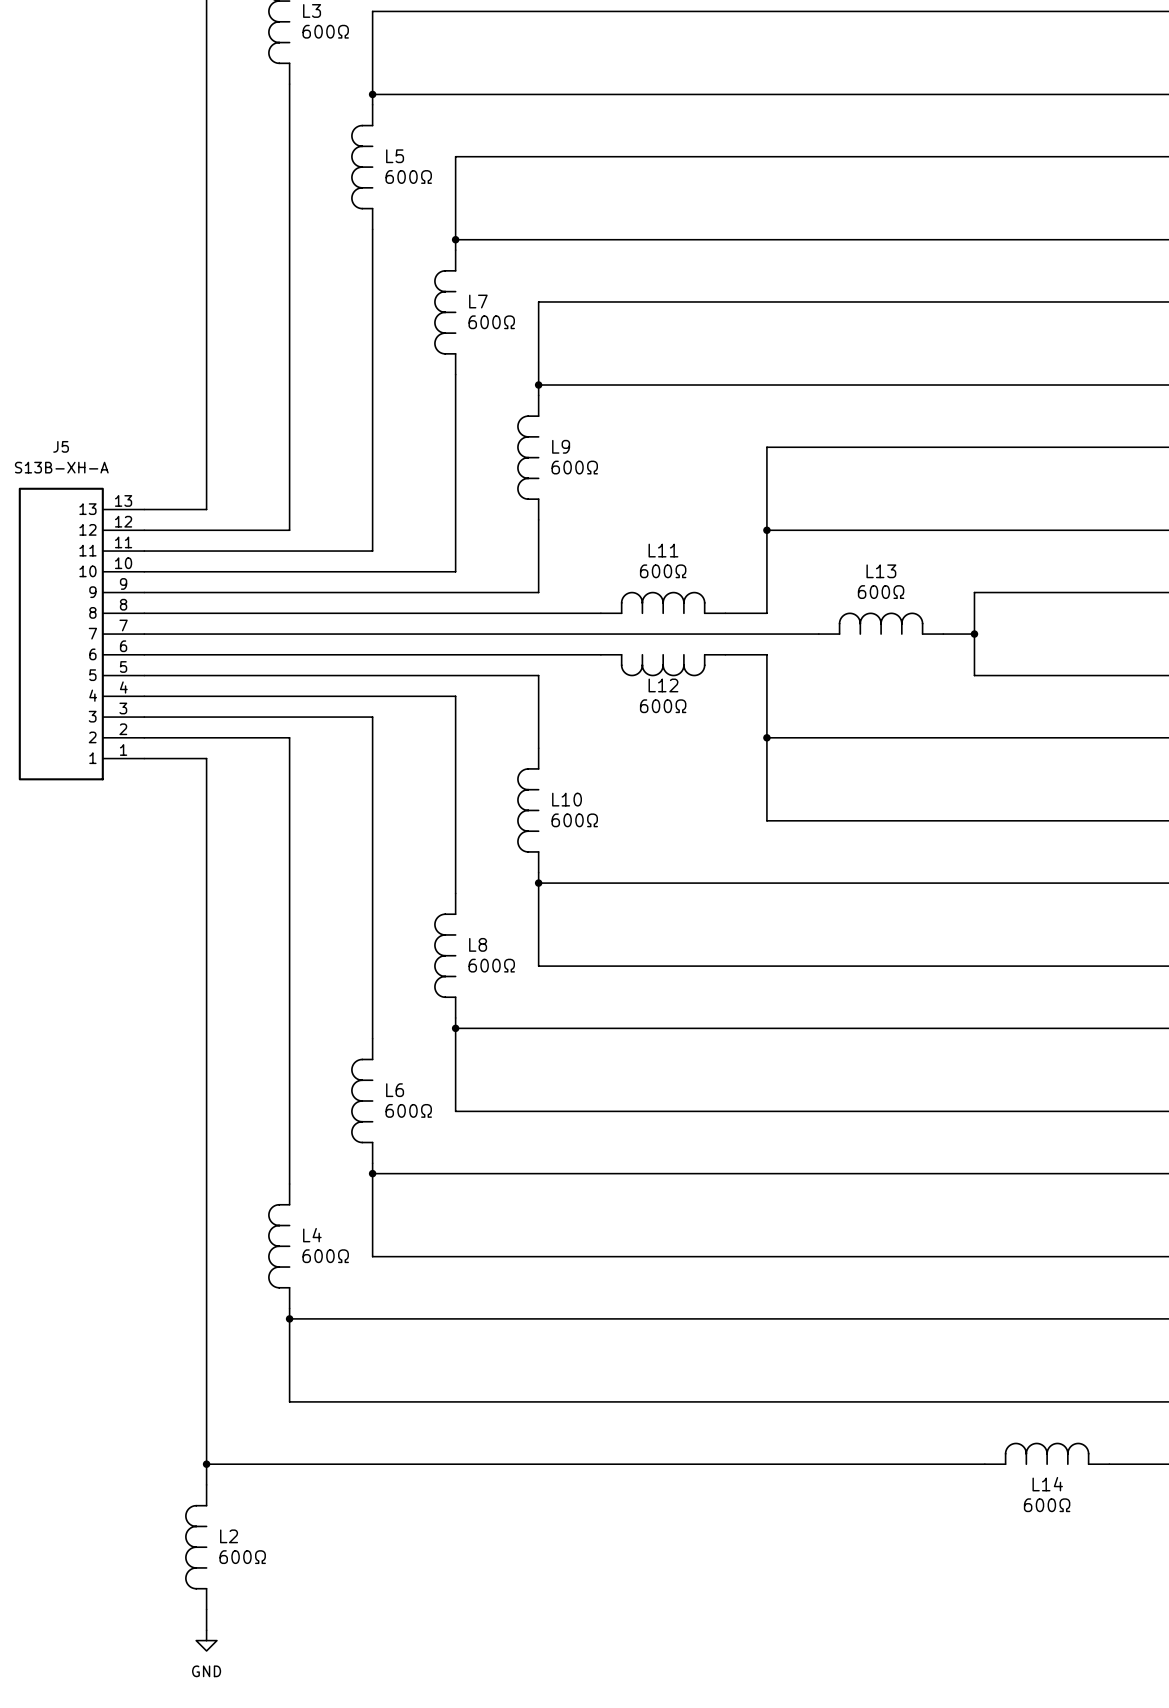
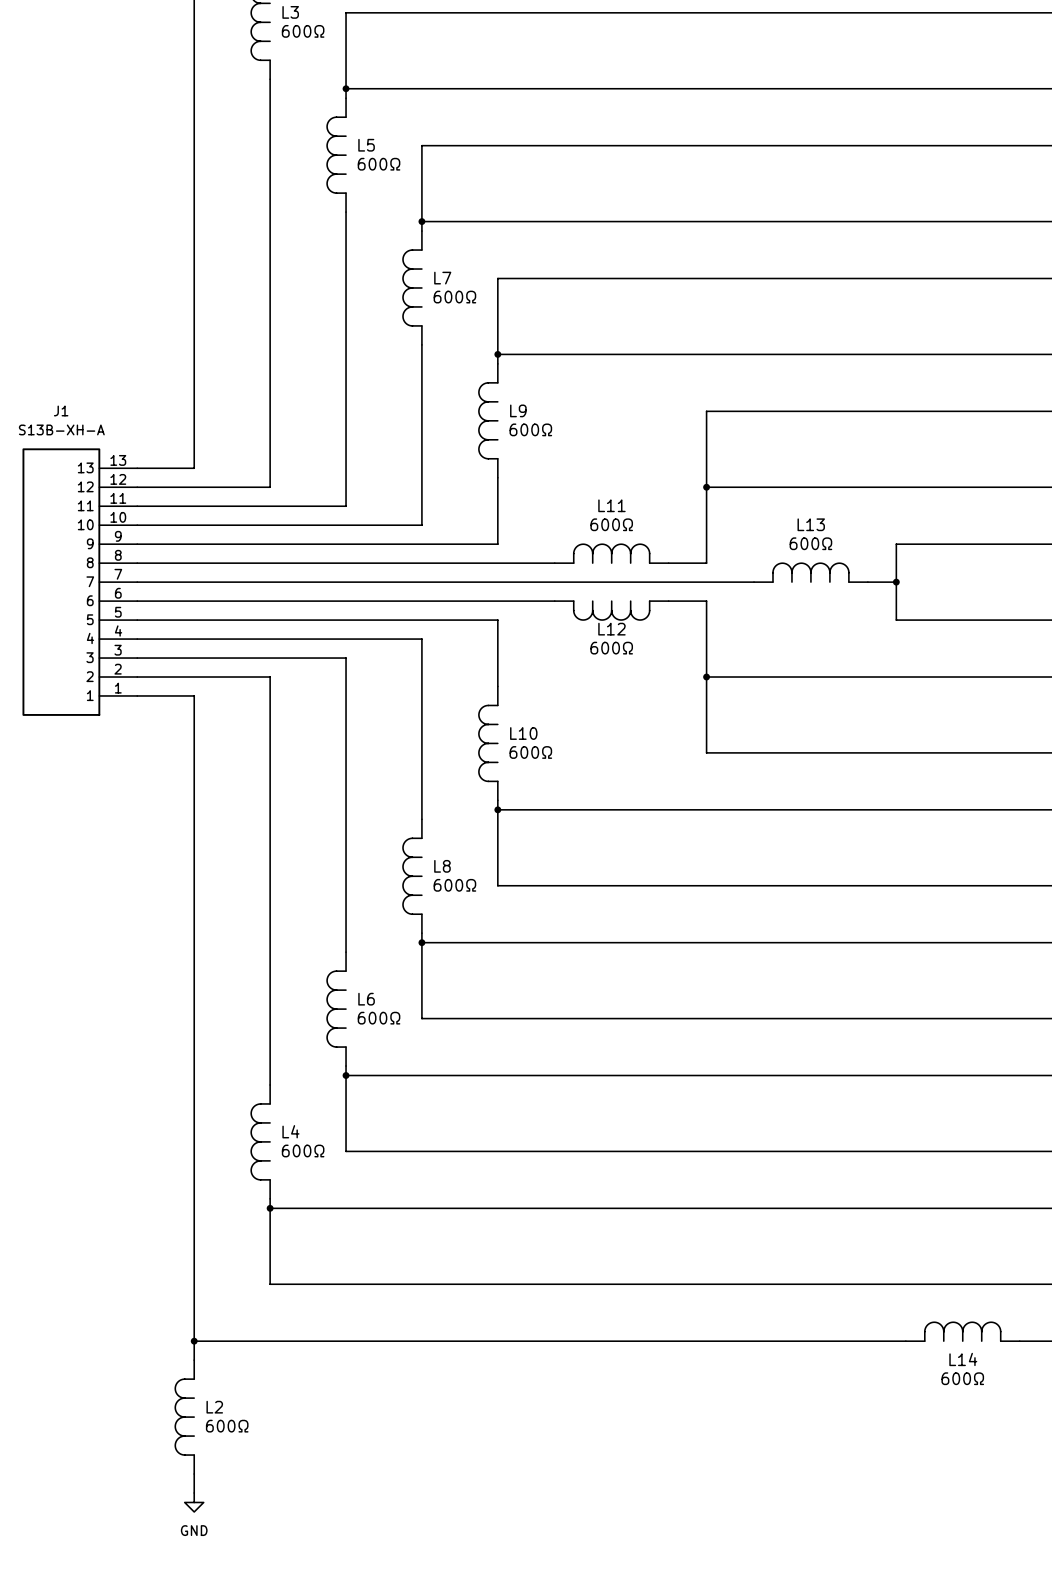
J5 name: J5 (61, 446) -> J1 (61, 410)

